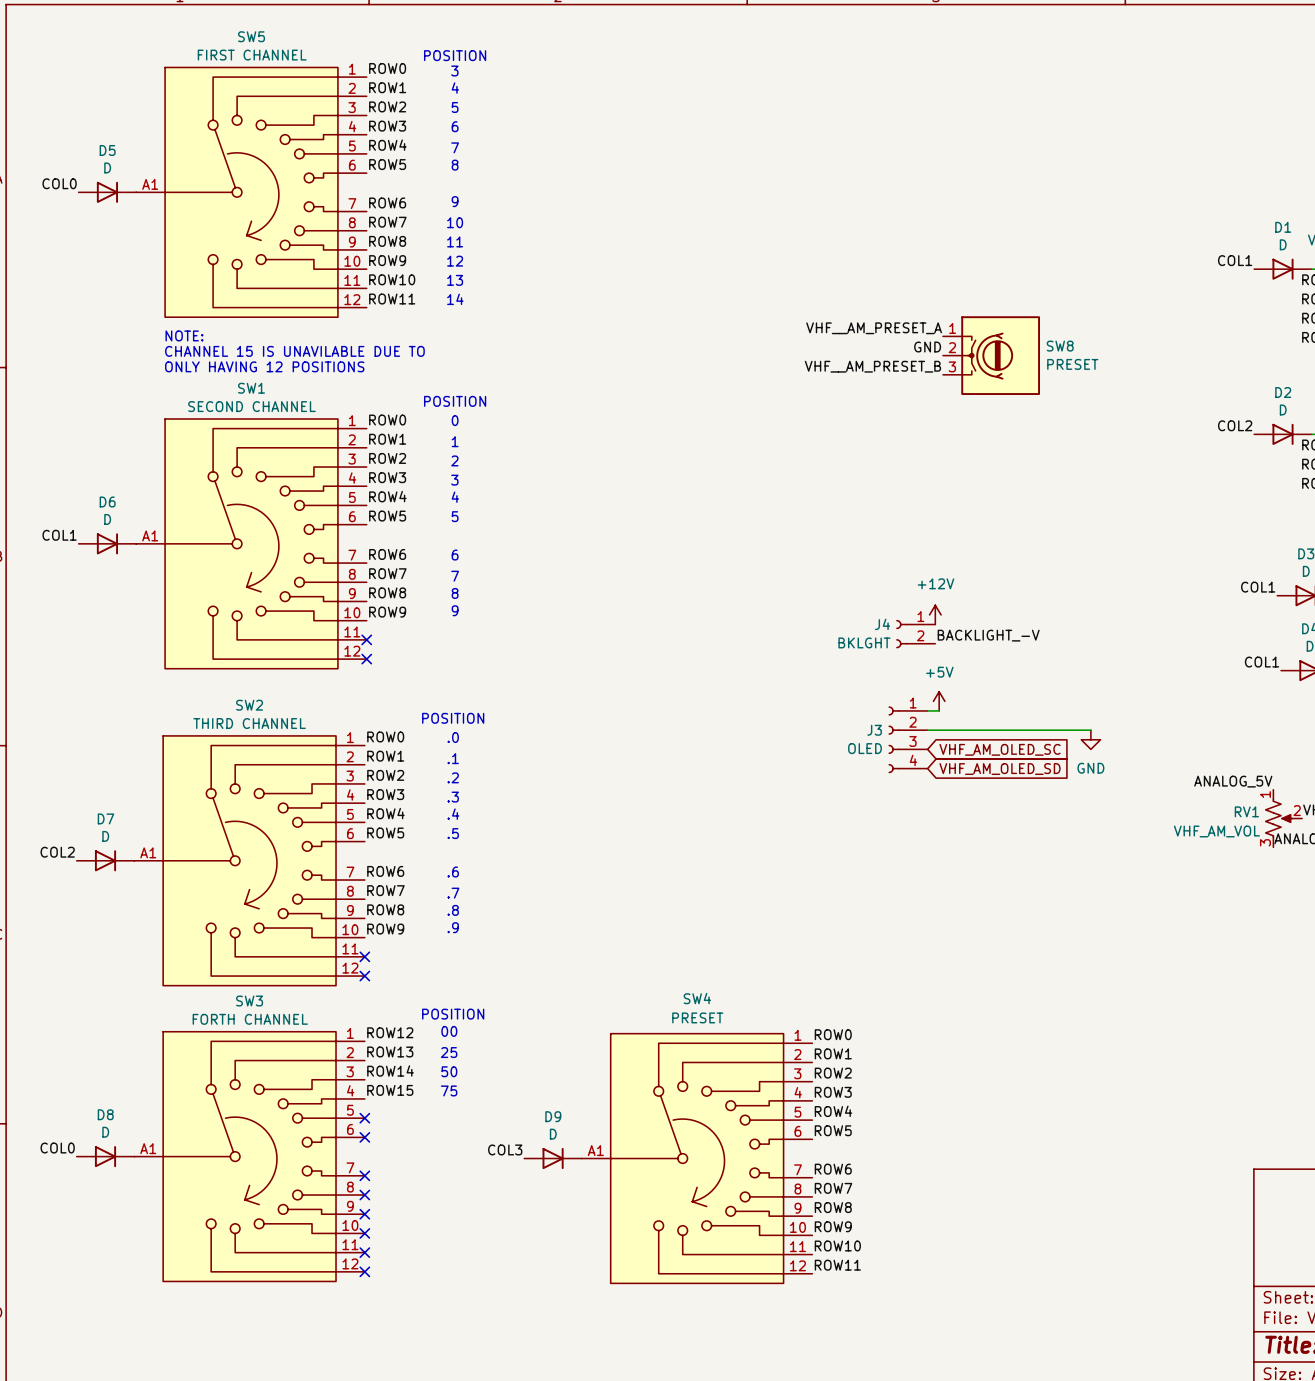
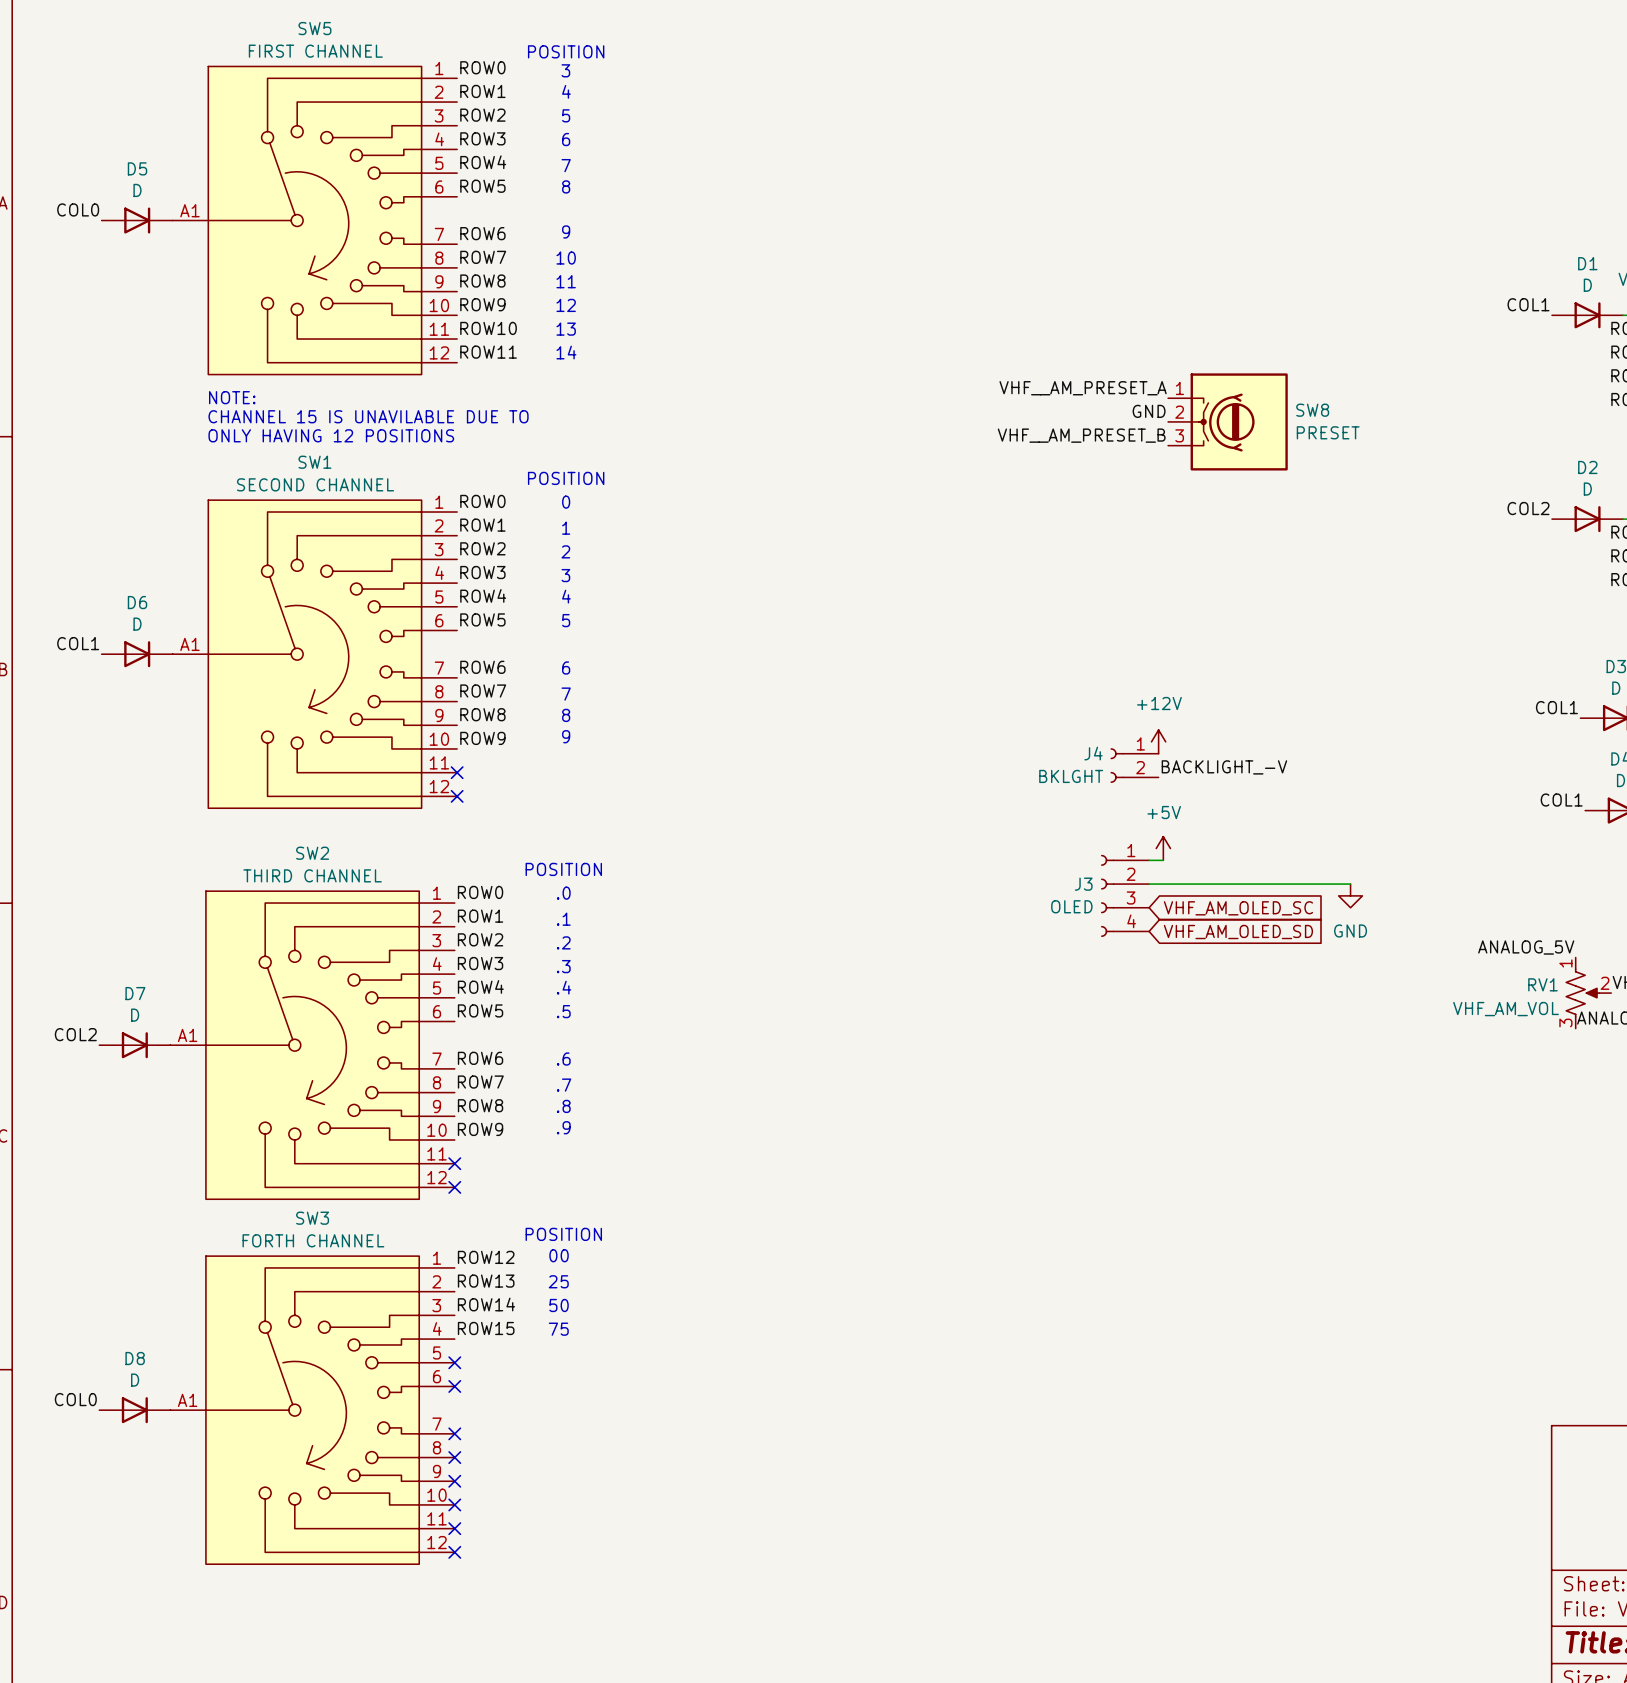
label: ROW0 (833, 1034) -> none
label: ROW1 (833, 1053) -> none
label: ROW2 (833, 1073) -> none
label: ROW3 (833, 1092) -> none
label: ROW4 (833, 1111) -> none
label: ROW5 (833, 1130) -> none
label: COL3 (505, 1149) -> none
D9: D (553, 1158) -> none
SW4: PRESET (697, 1158) -> none
label: ROW6 (833, 1169) -> none
label: ROW7 (833, 1188) -> none
label: ROW8 (833, 1207) -> none
label: ROW9 (833, 1226) -> none
label: ROW10 (837, 1245) -> none
label: ROW11 (837, 1265) -> none

